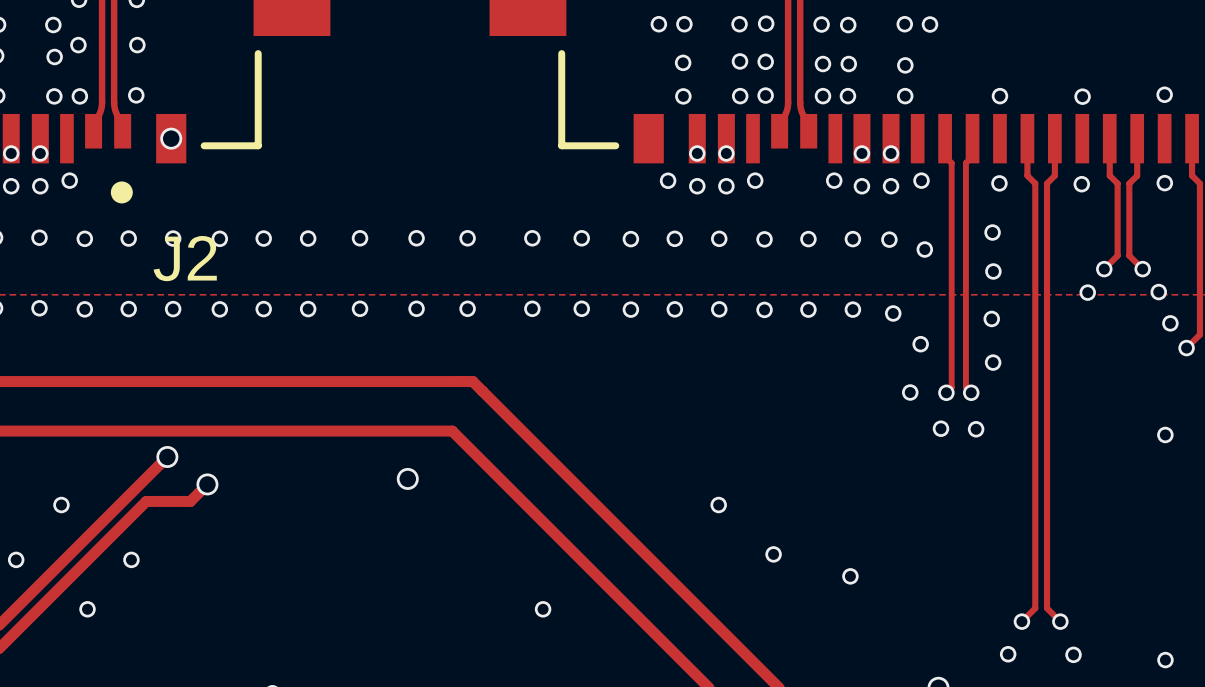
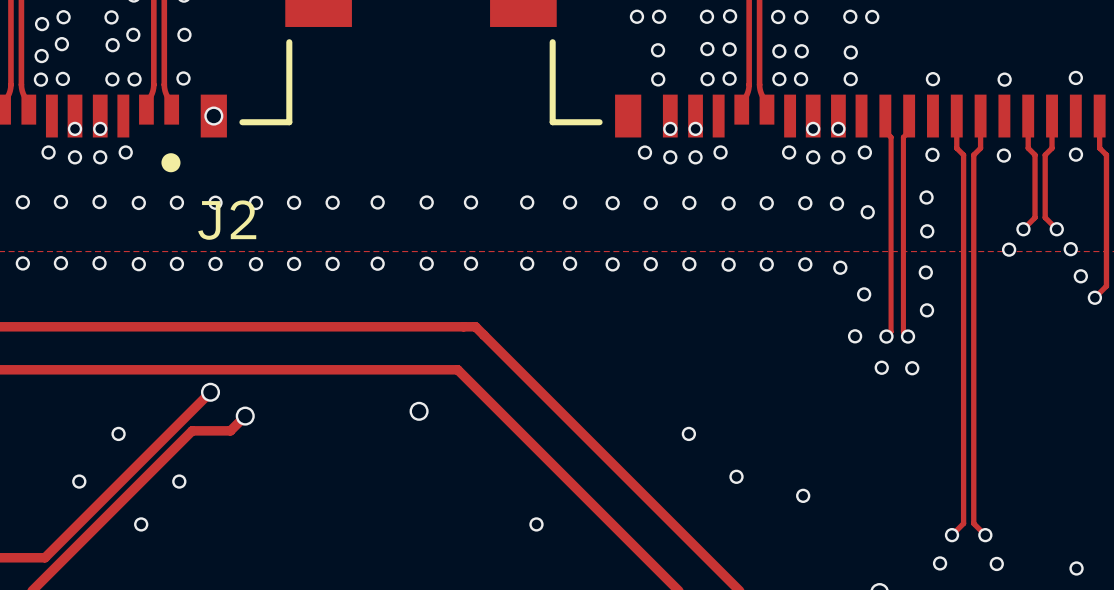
via: (1165, 434) -> none

